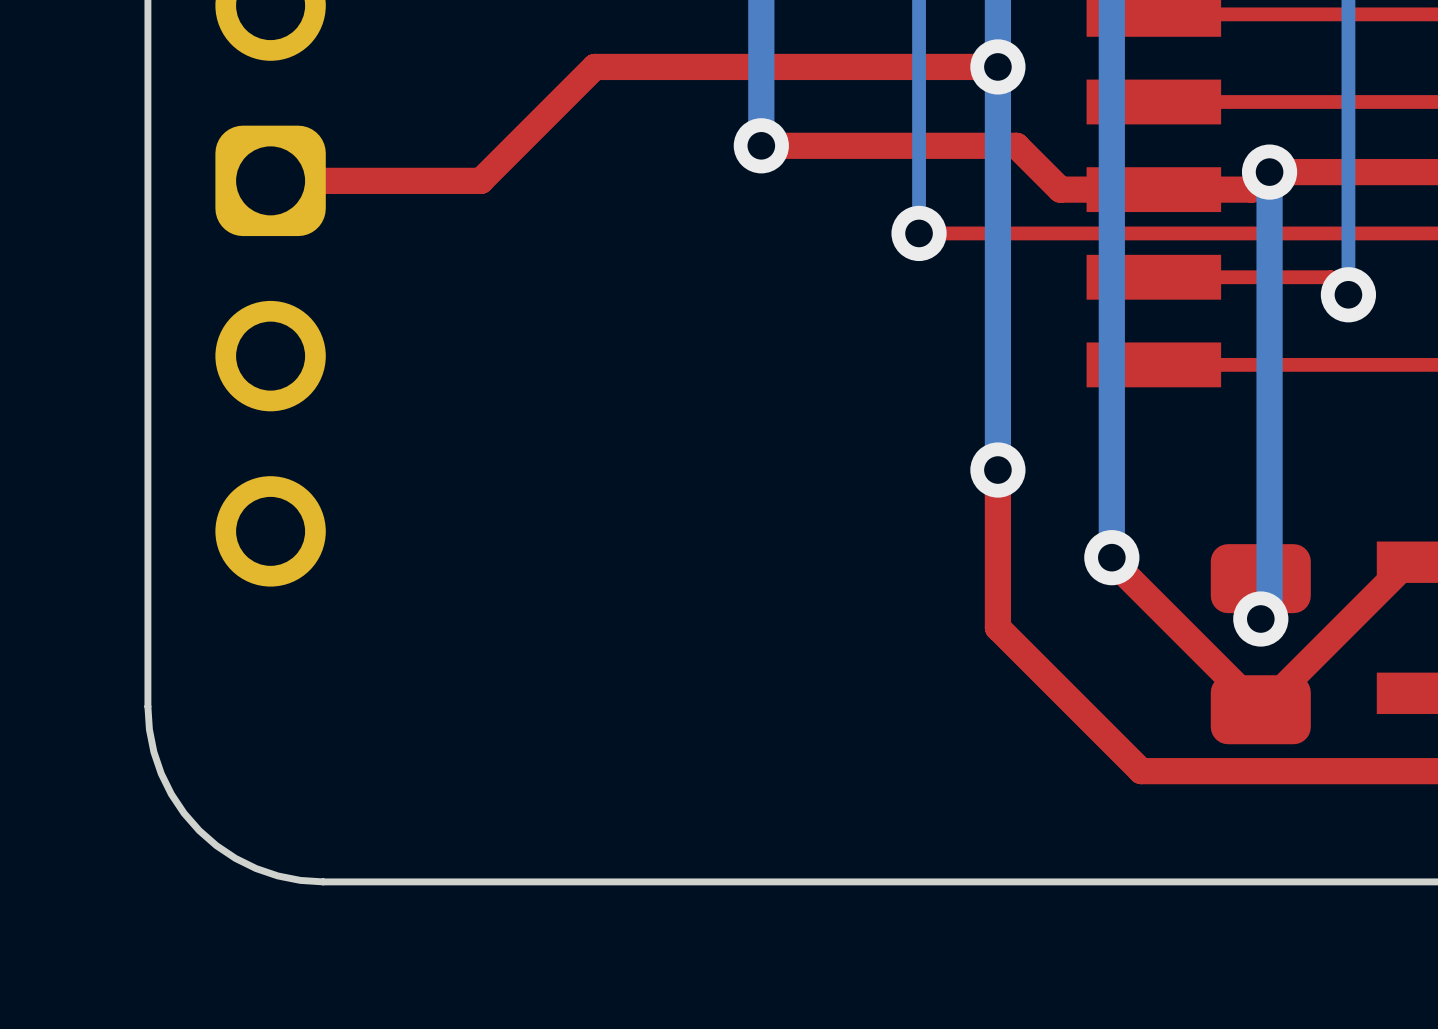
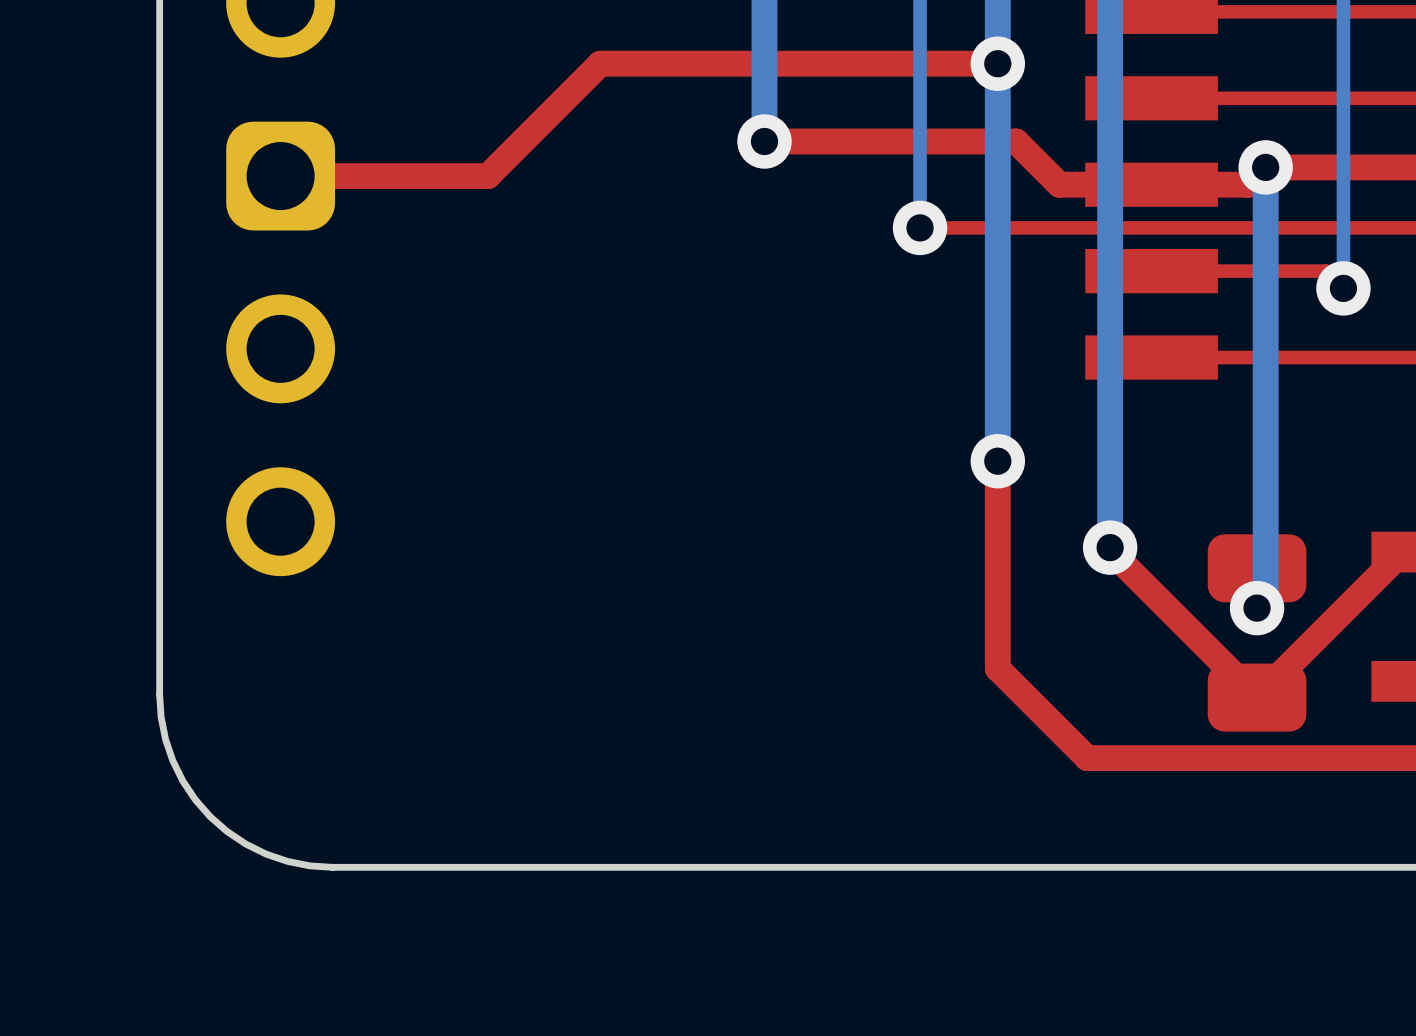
top track: (997, 627) (1141, 771) -> (997, 616) (997, 668) (1087, 758) (1139, 758)

